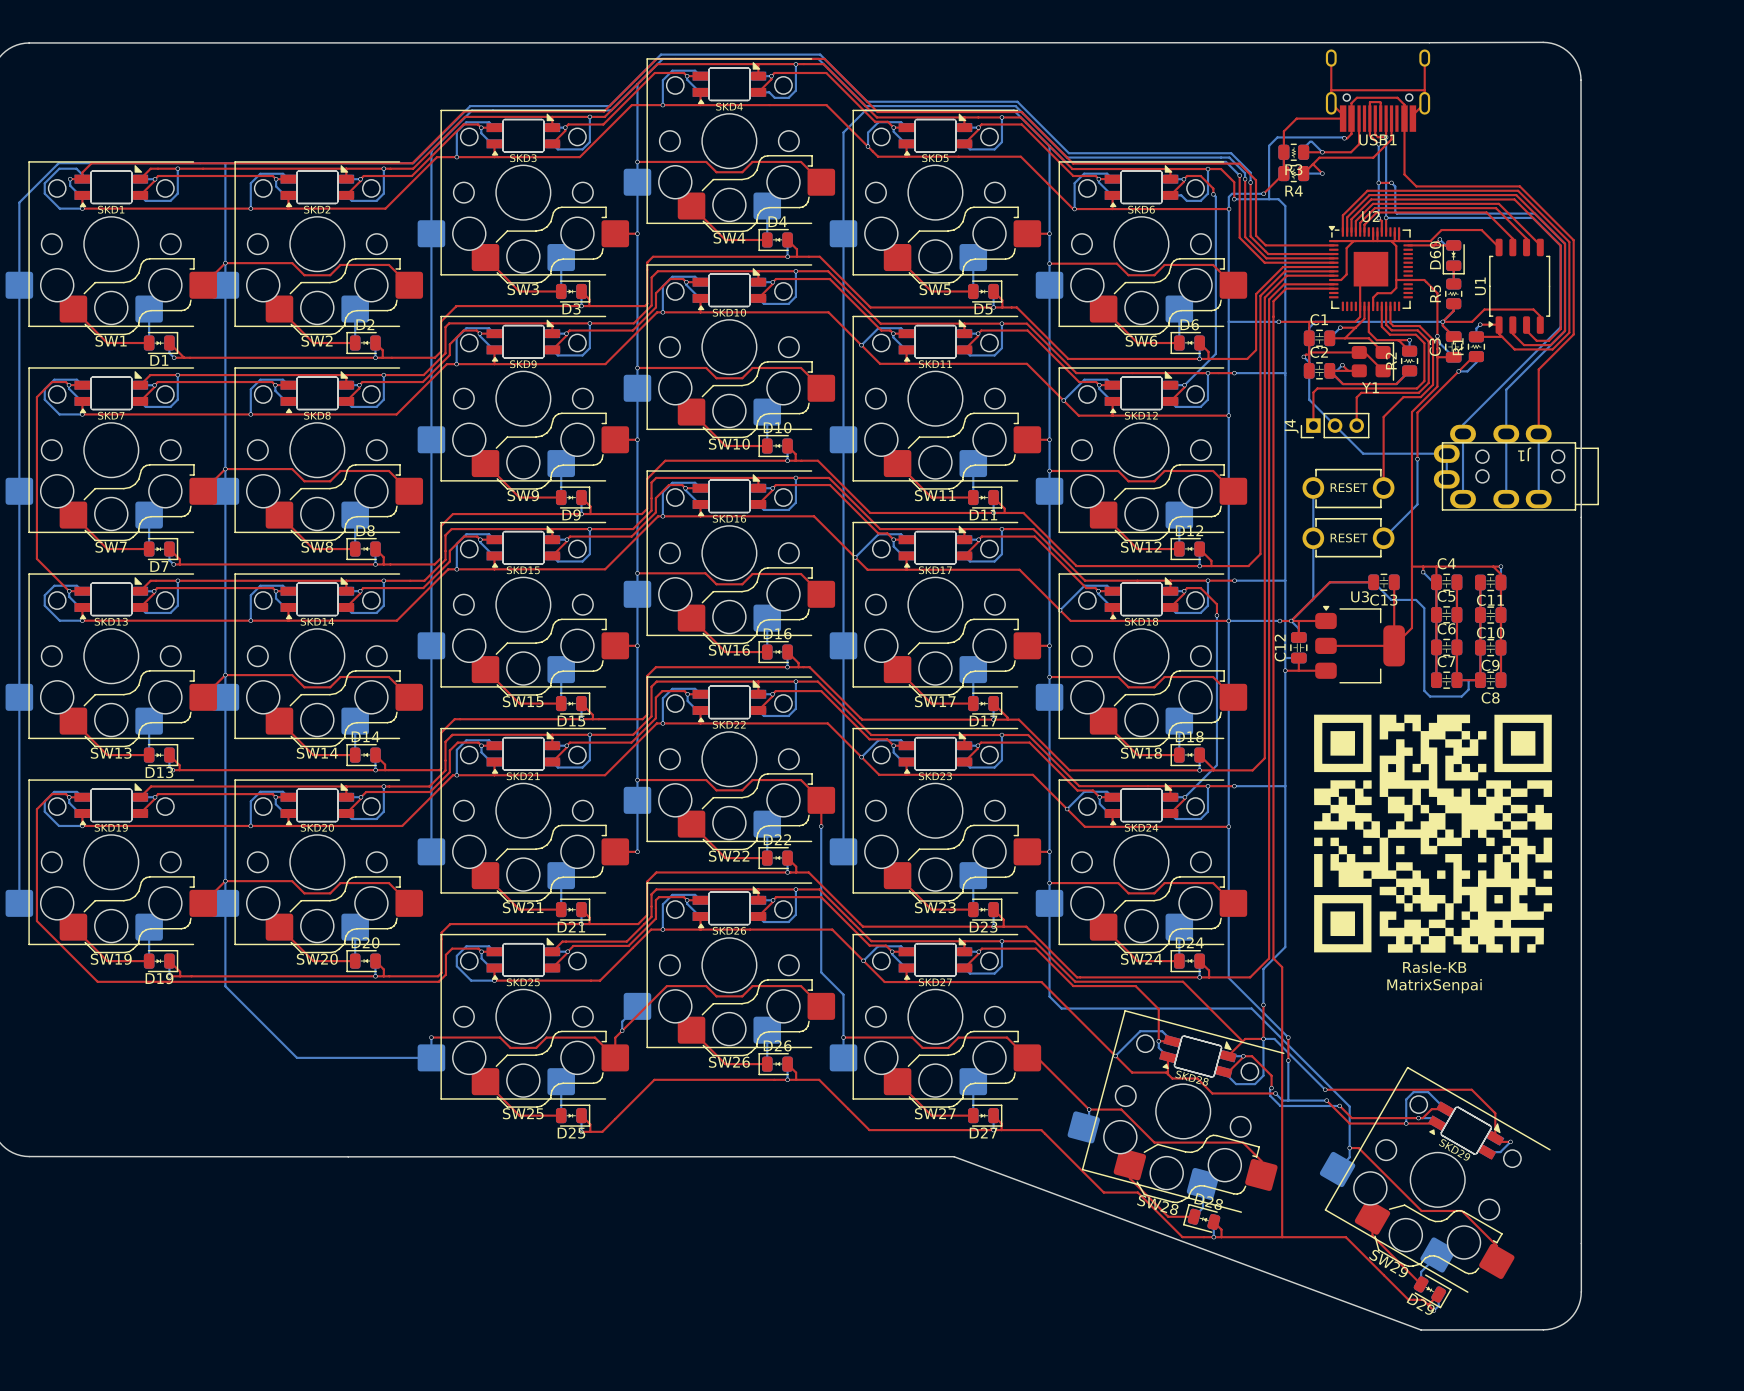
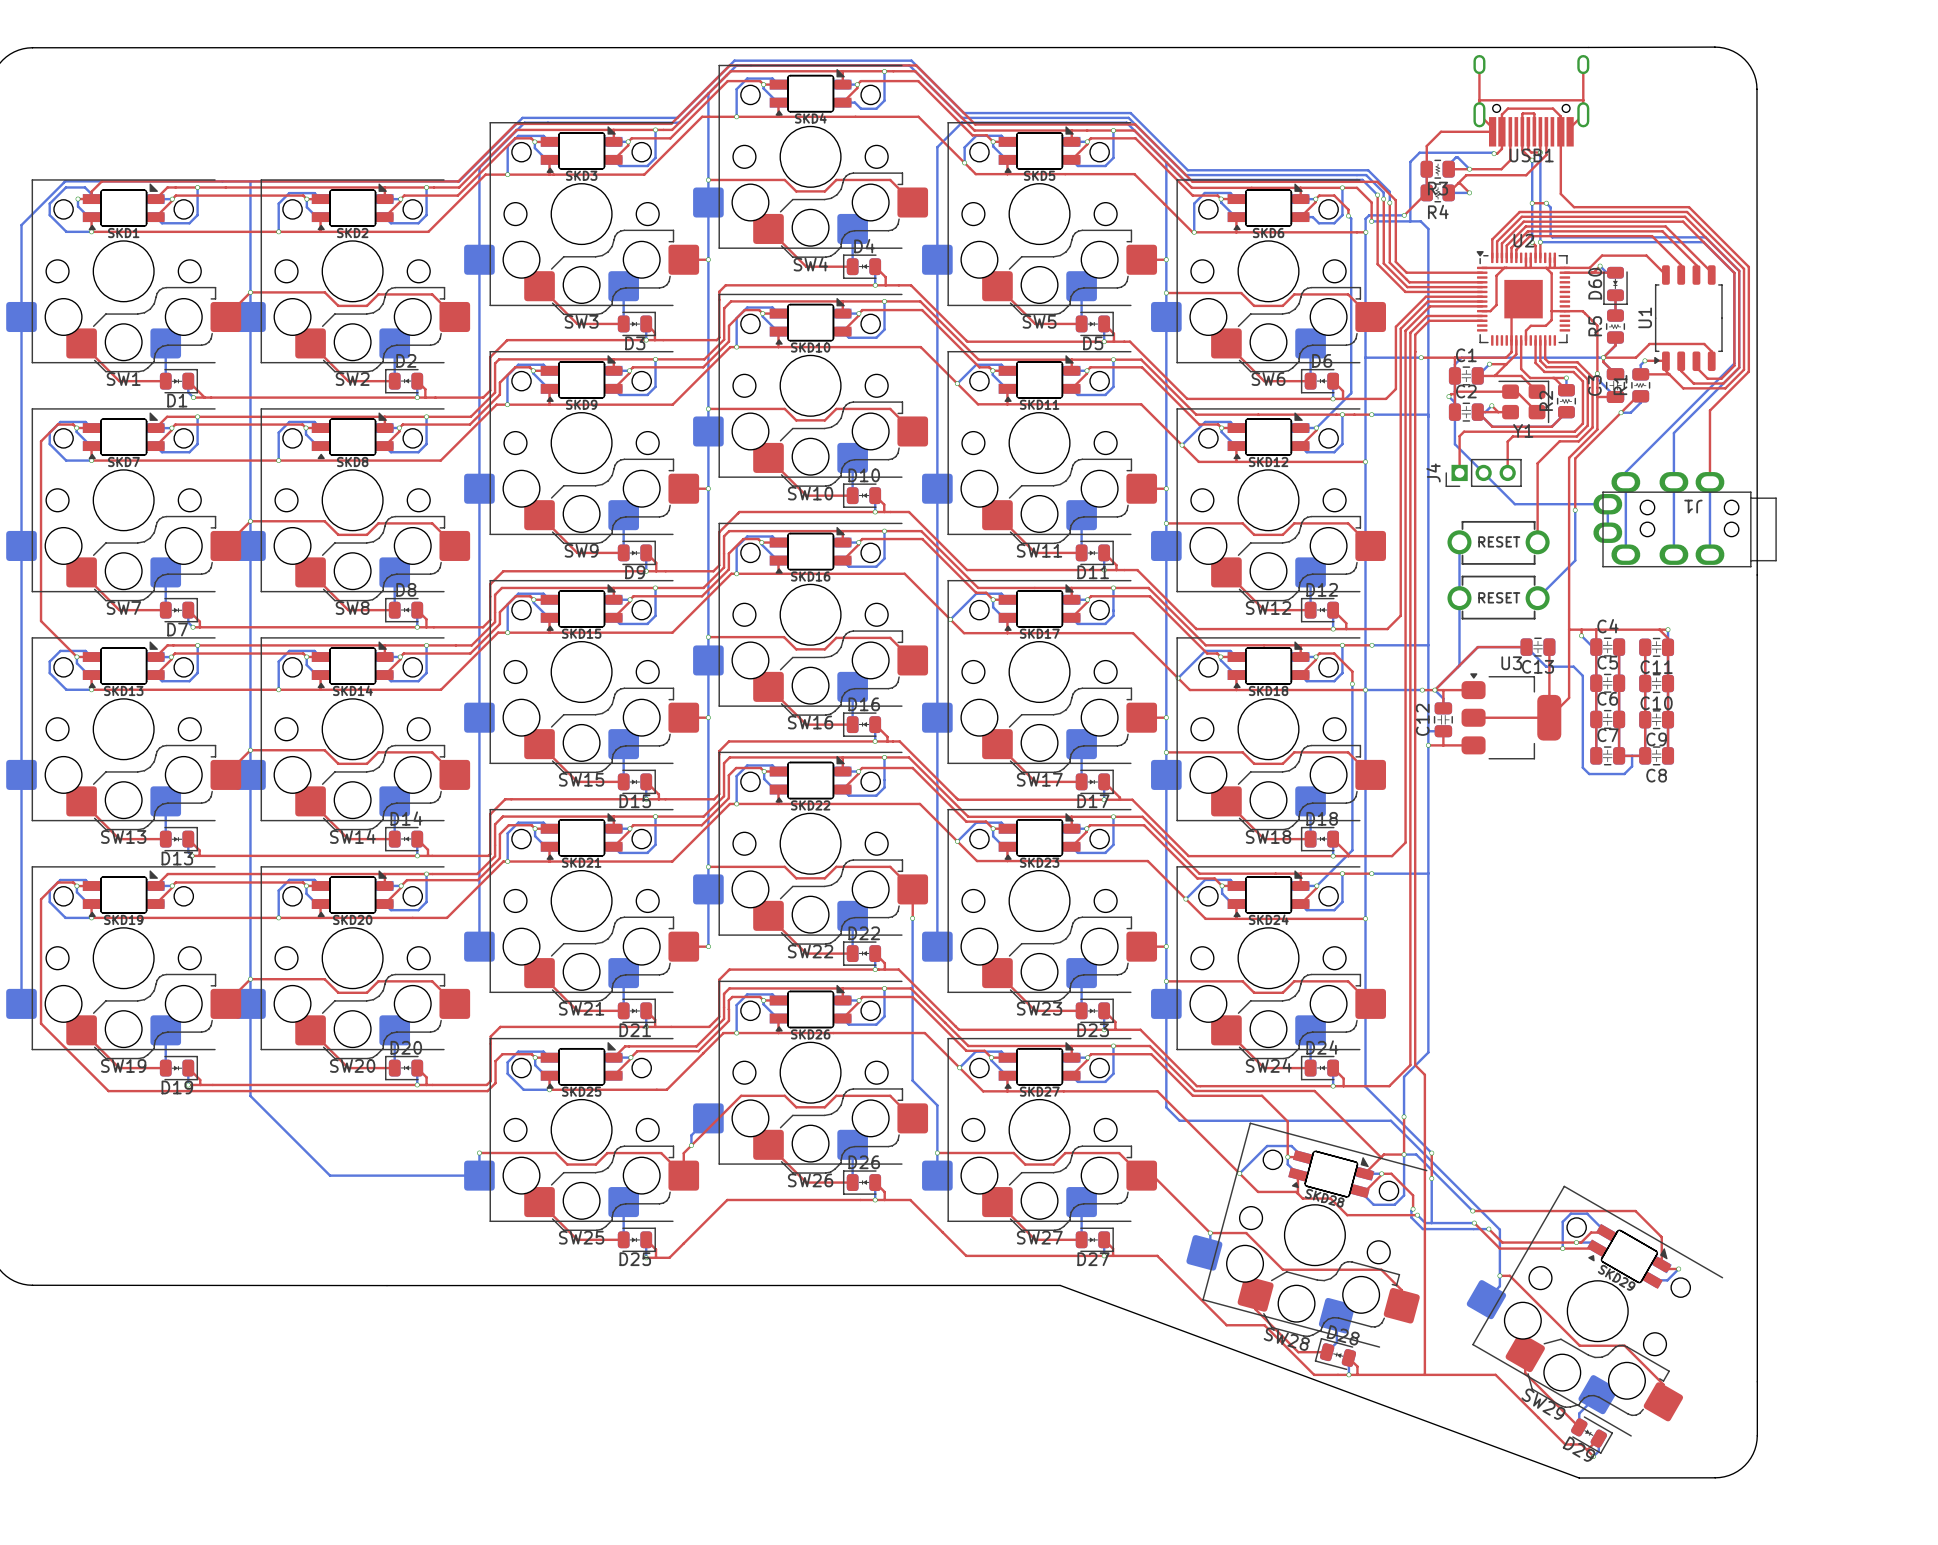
drawing: [1314, 714, 1553, 953] -> none
text: Rasle-KB (1434, 967) -> none
text: MatrixSenpai (1434, 986) -> none

